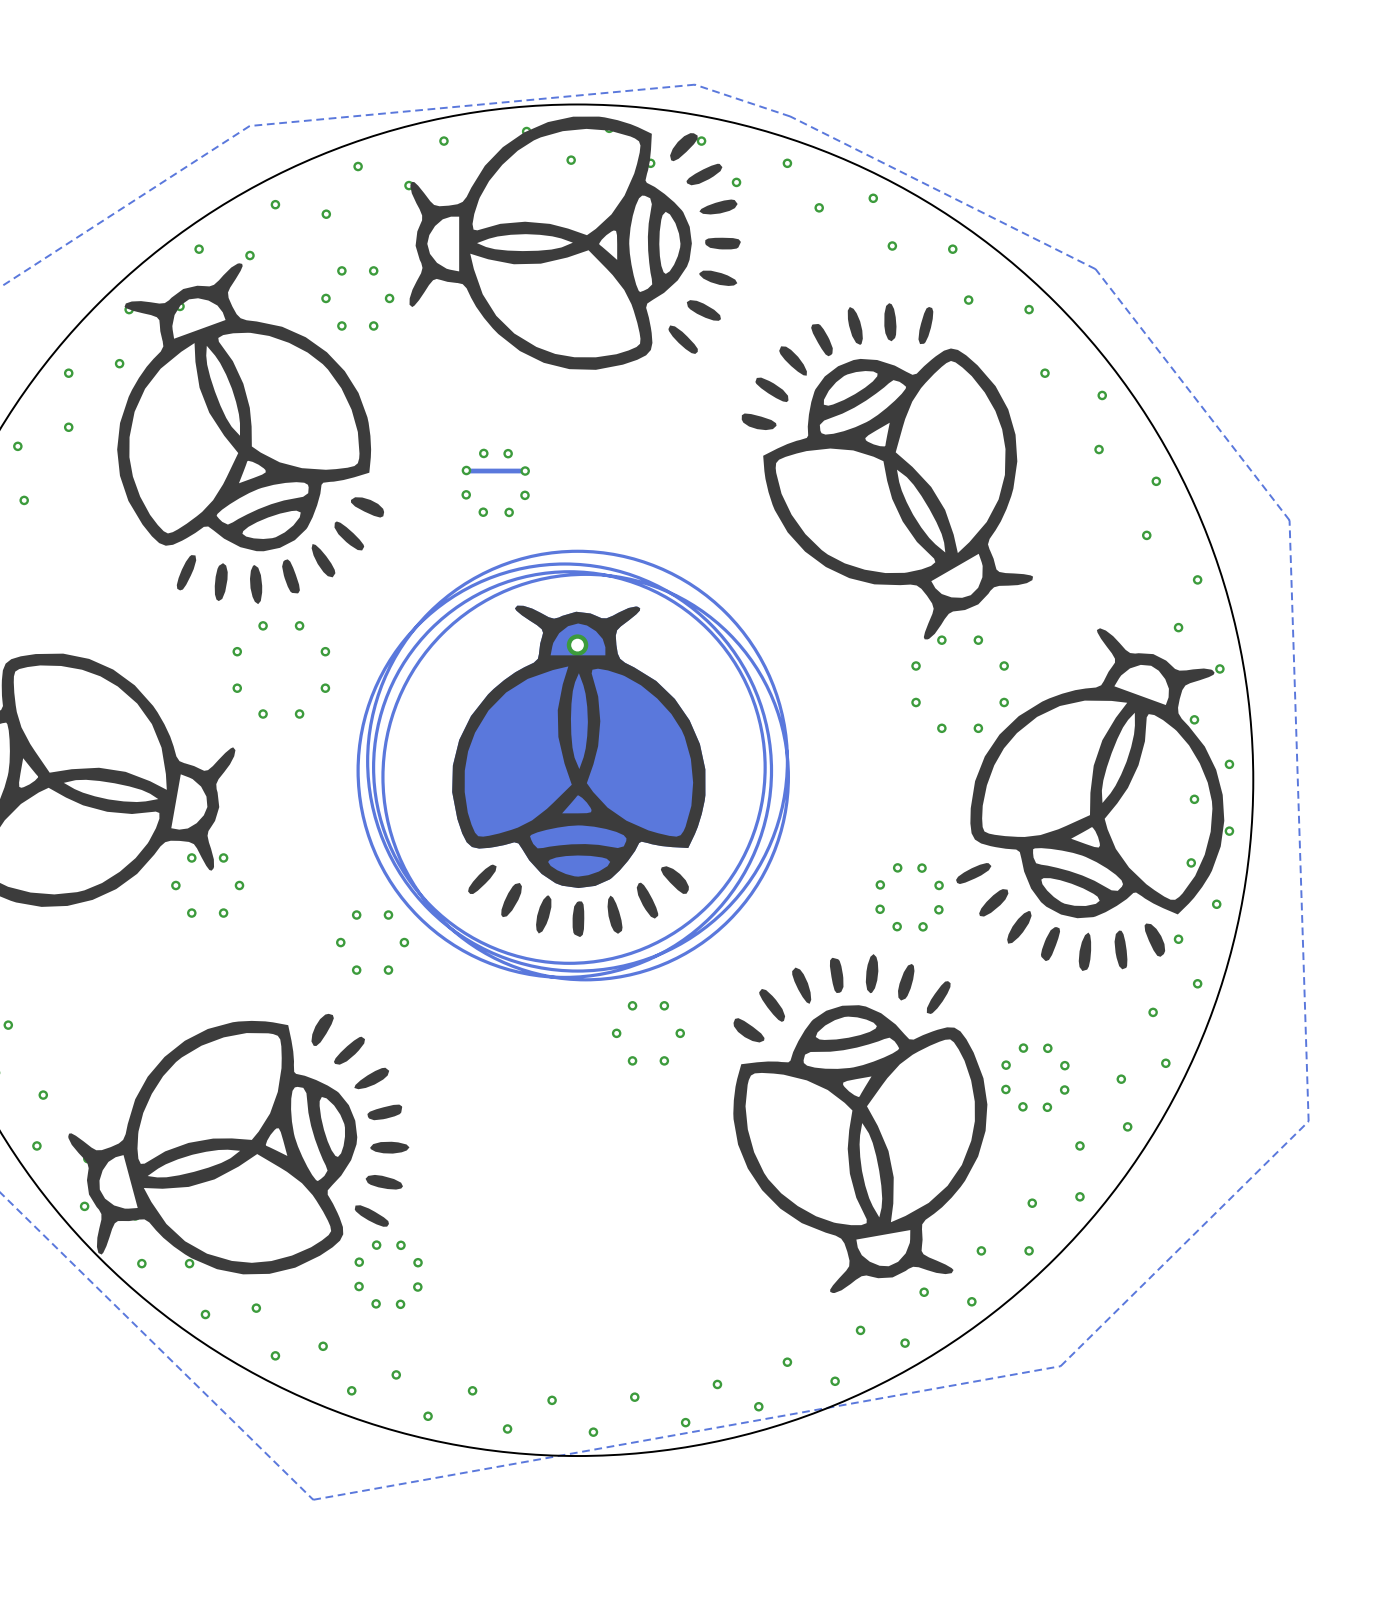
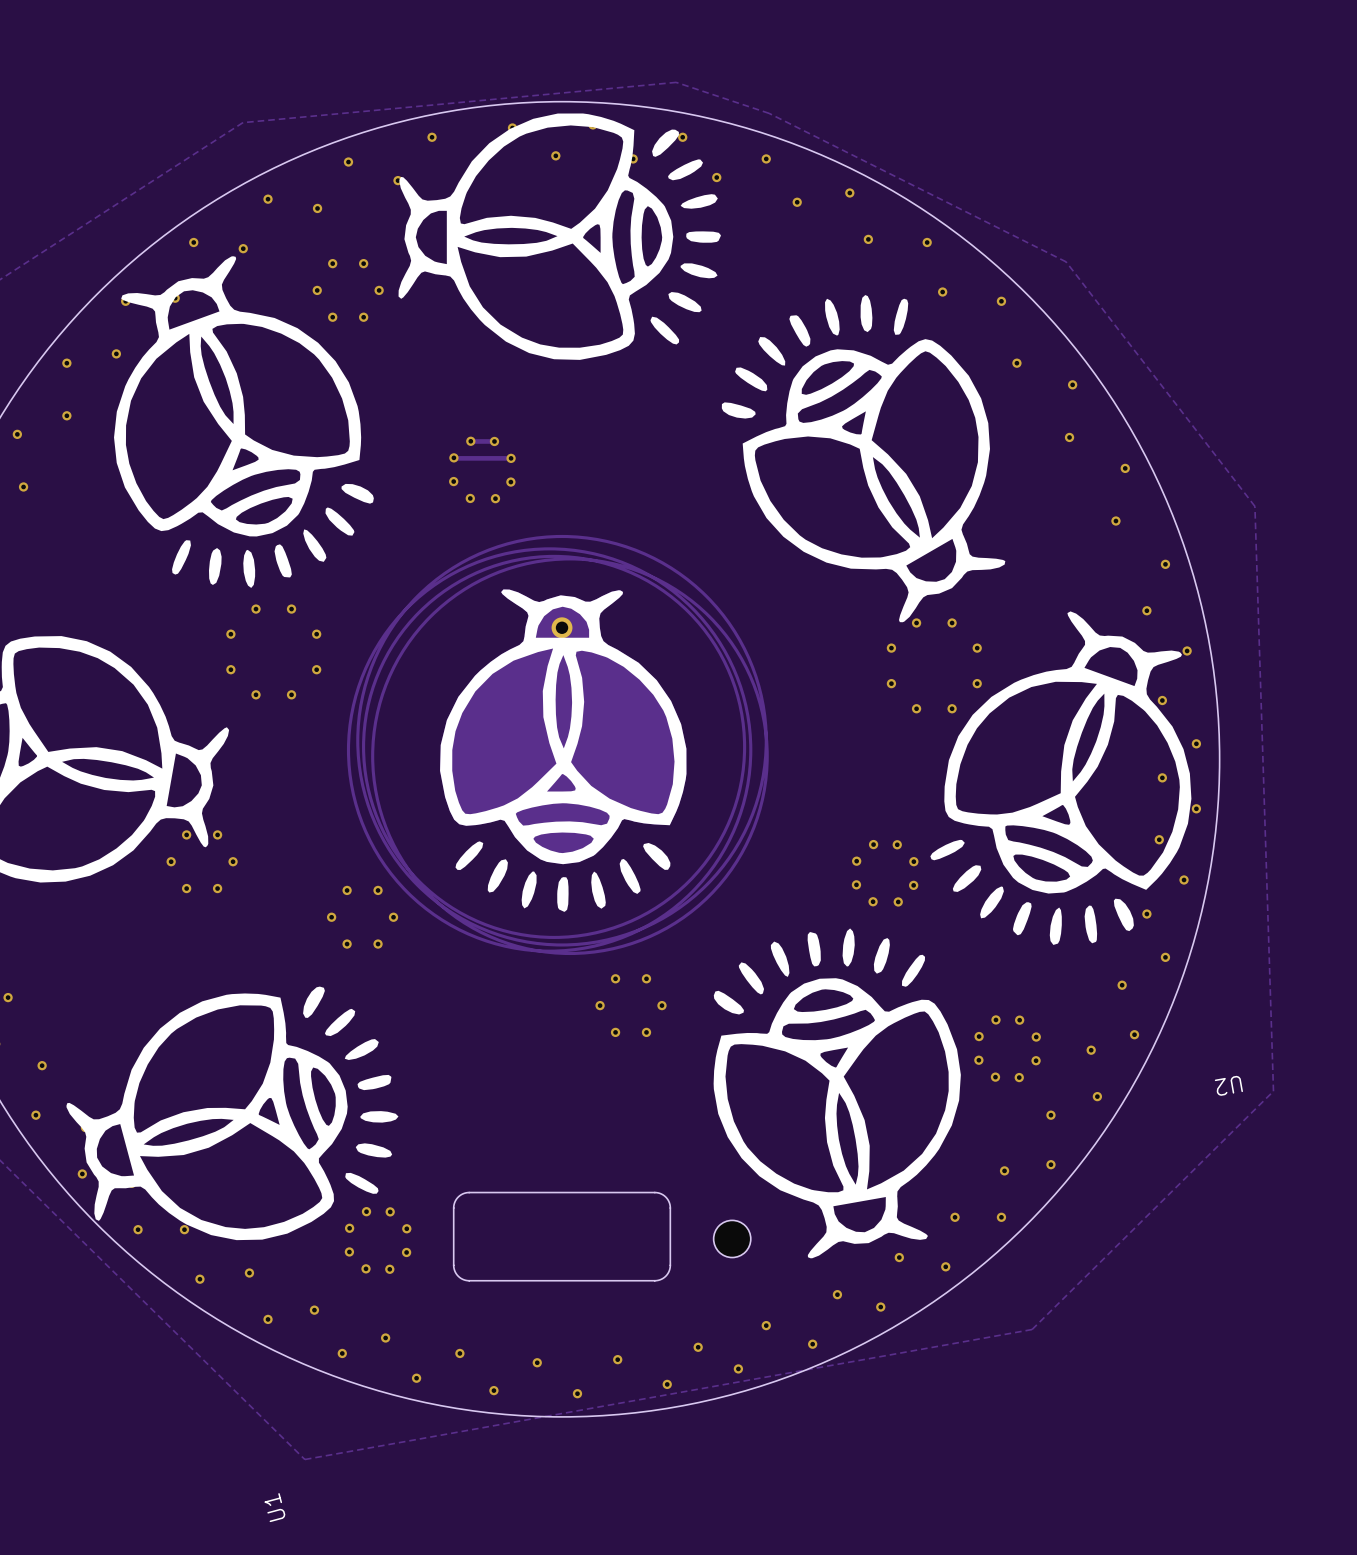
track: none -> (494, 441) (471, 441)
U2: none -> (837, 1093)
U1: none -> (232, 1113)
part: none -> (562, 1236)
part: none -> (732, 1238)

